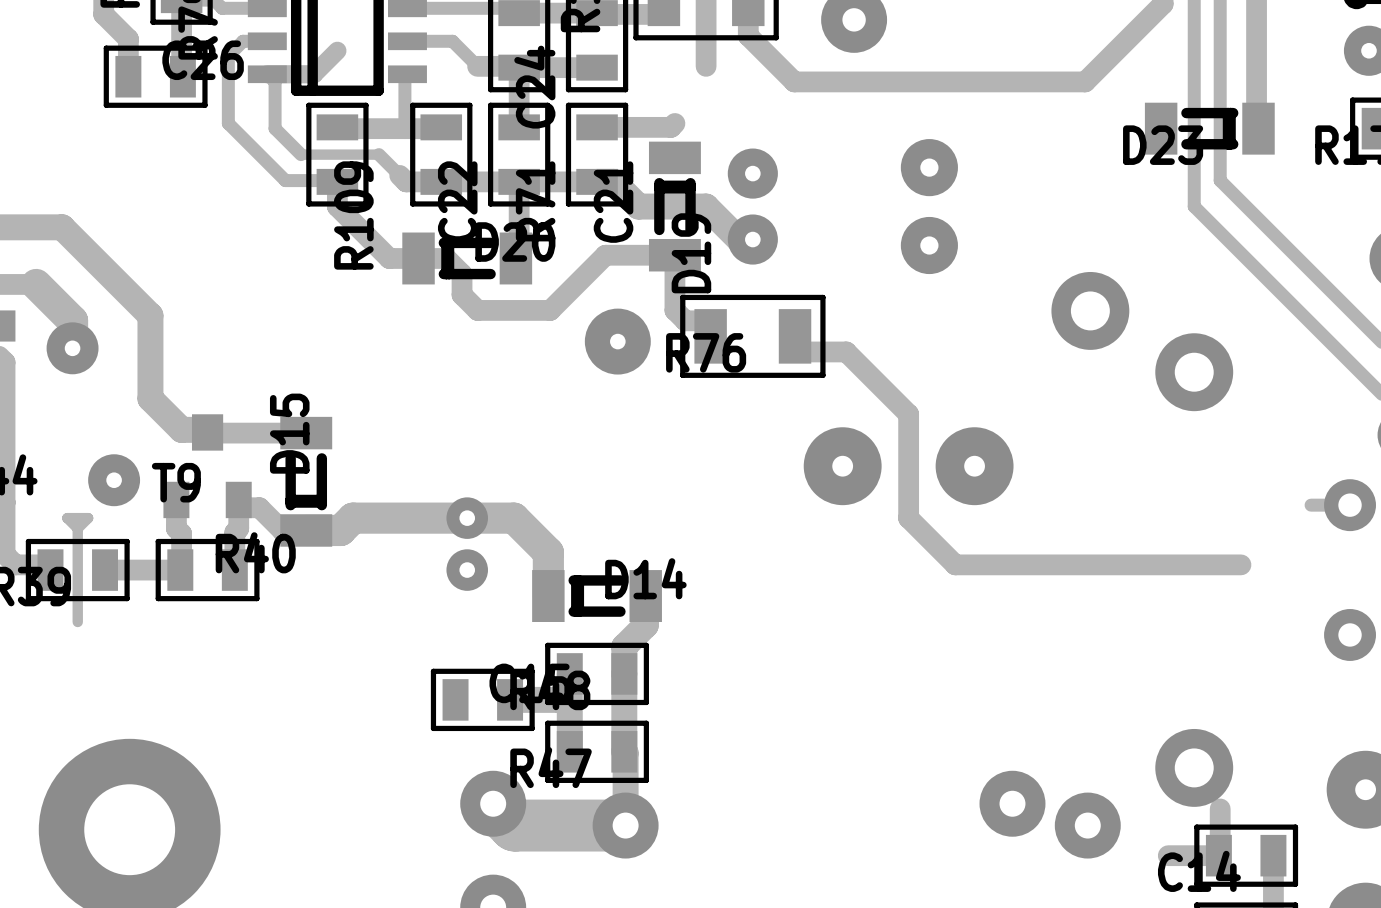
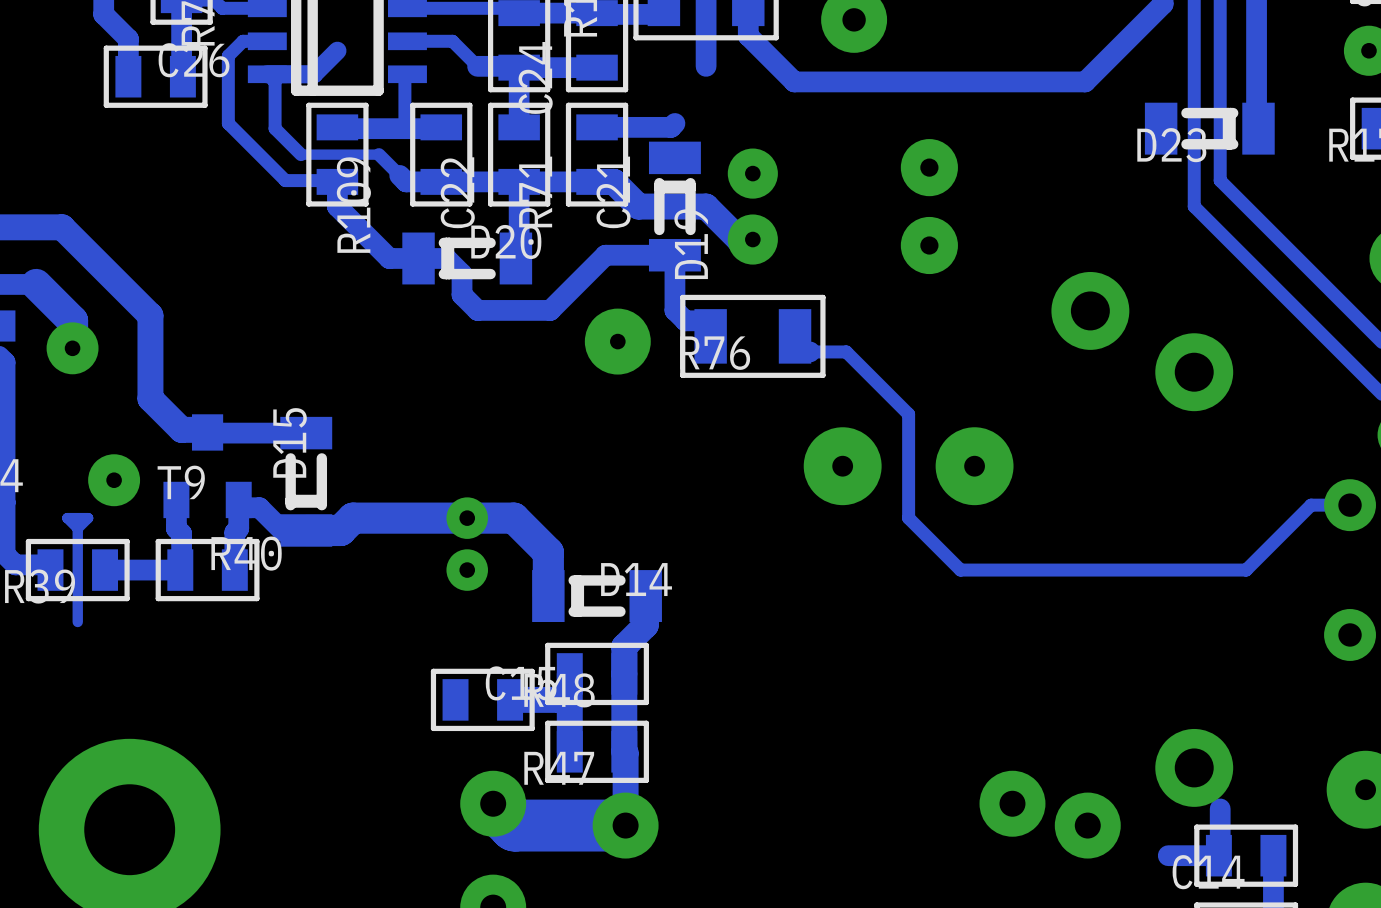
track width: thick (809, 351) (846, 351) (908, 414) (908, 518) (955, 564) -> thin (809, 351) (846, 351) (908, 414) (908, 518) (955, 564)
track: (1240, 564) (955, 564) -> (1311, 505) (1246, 570) (960, 570) (955, 564)

